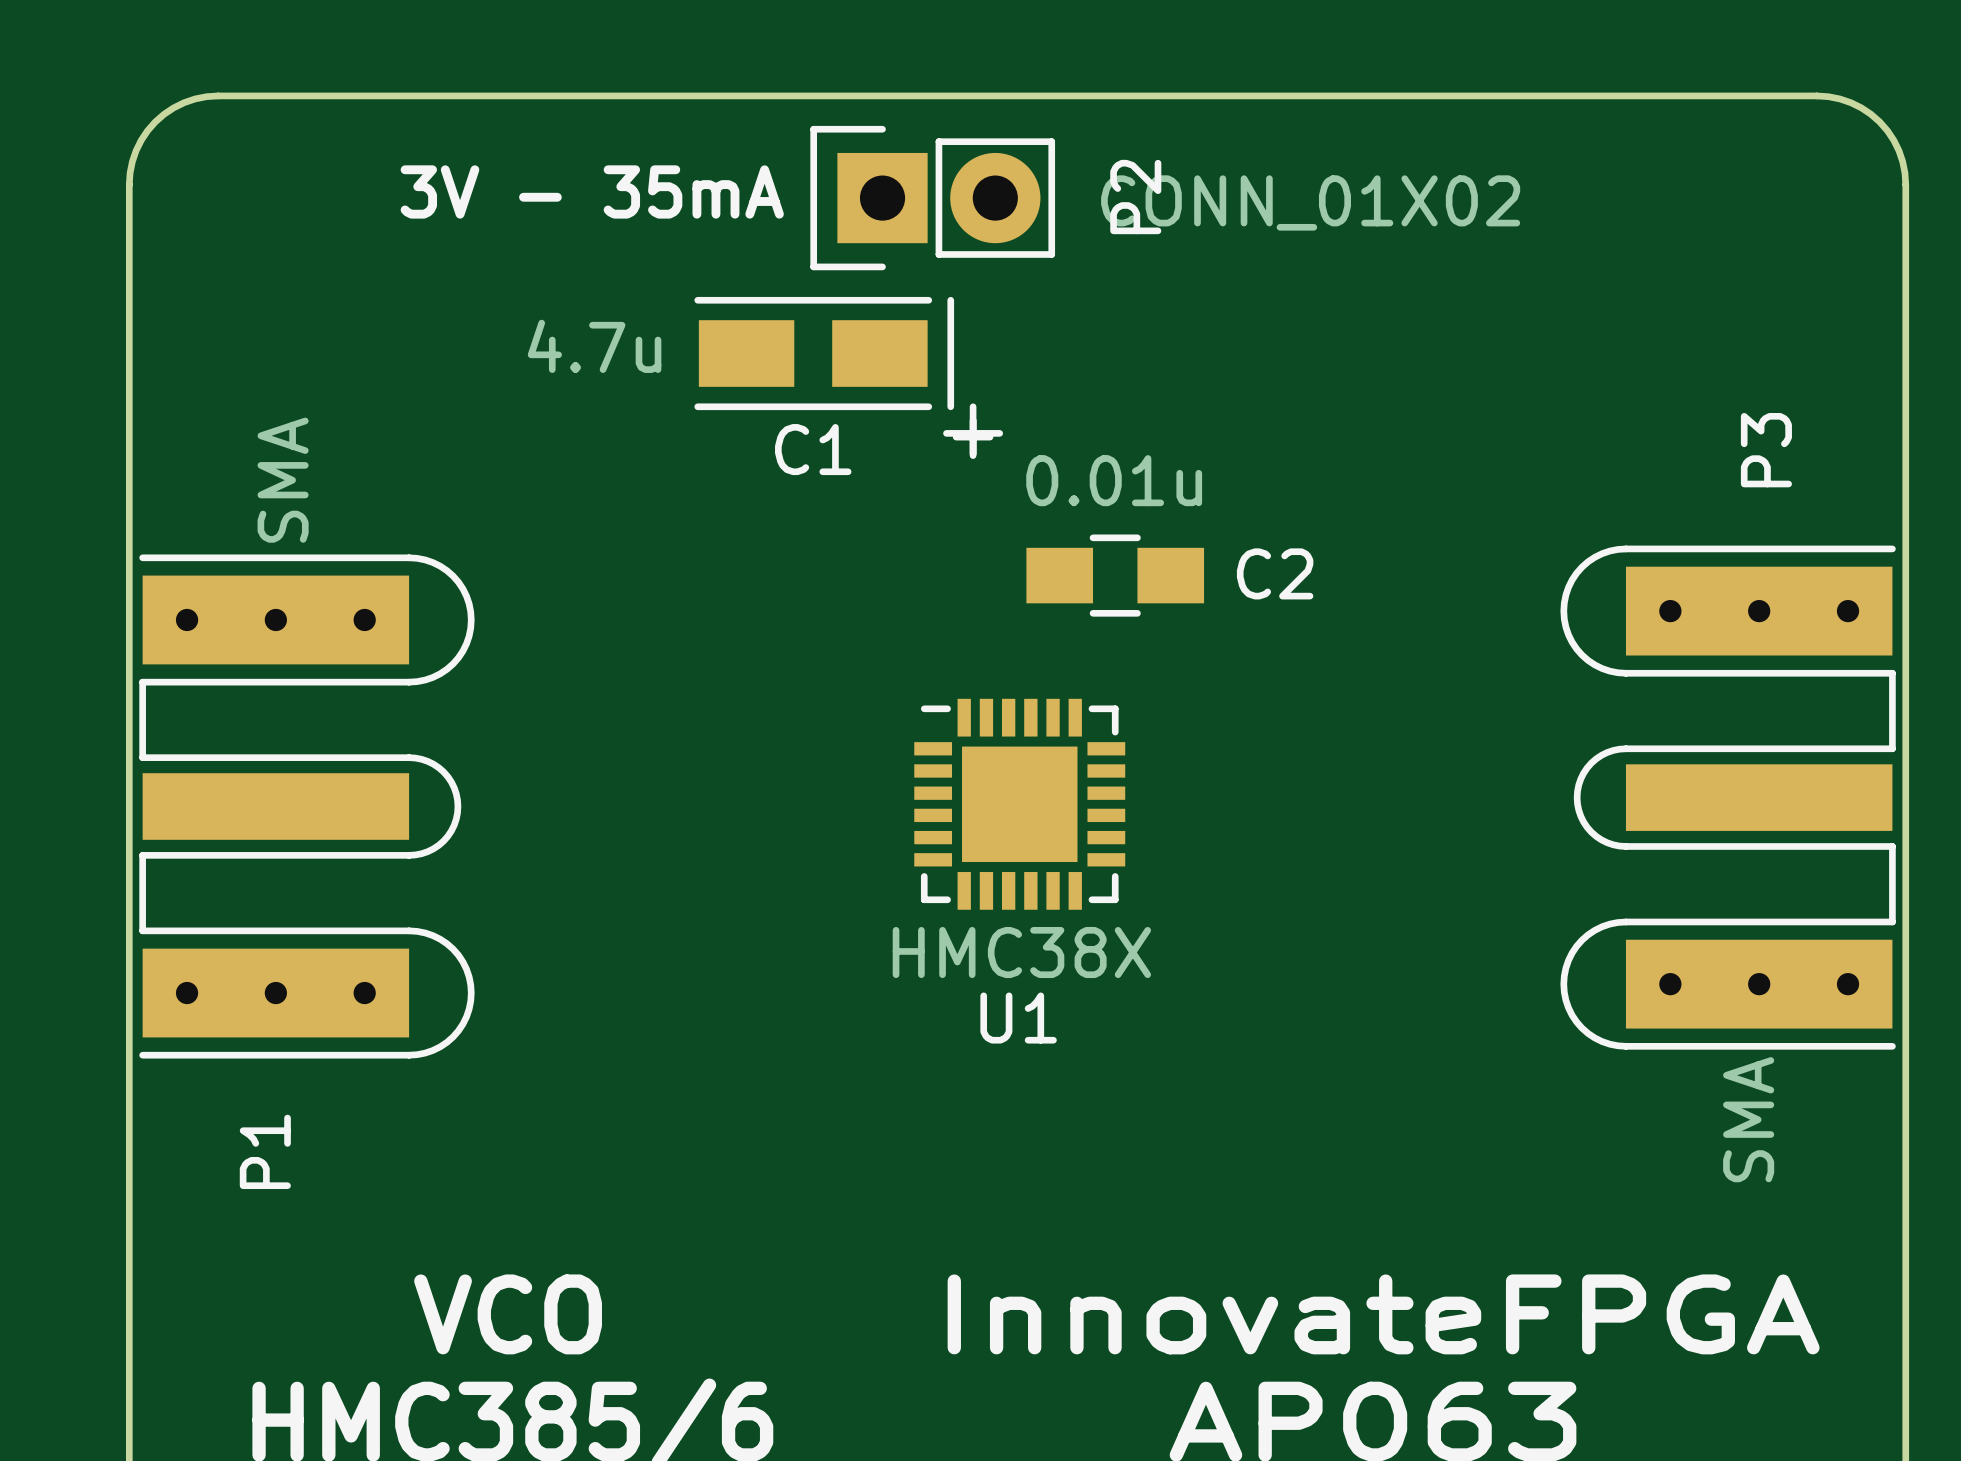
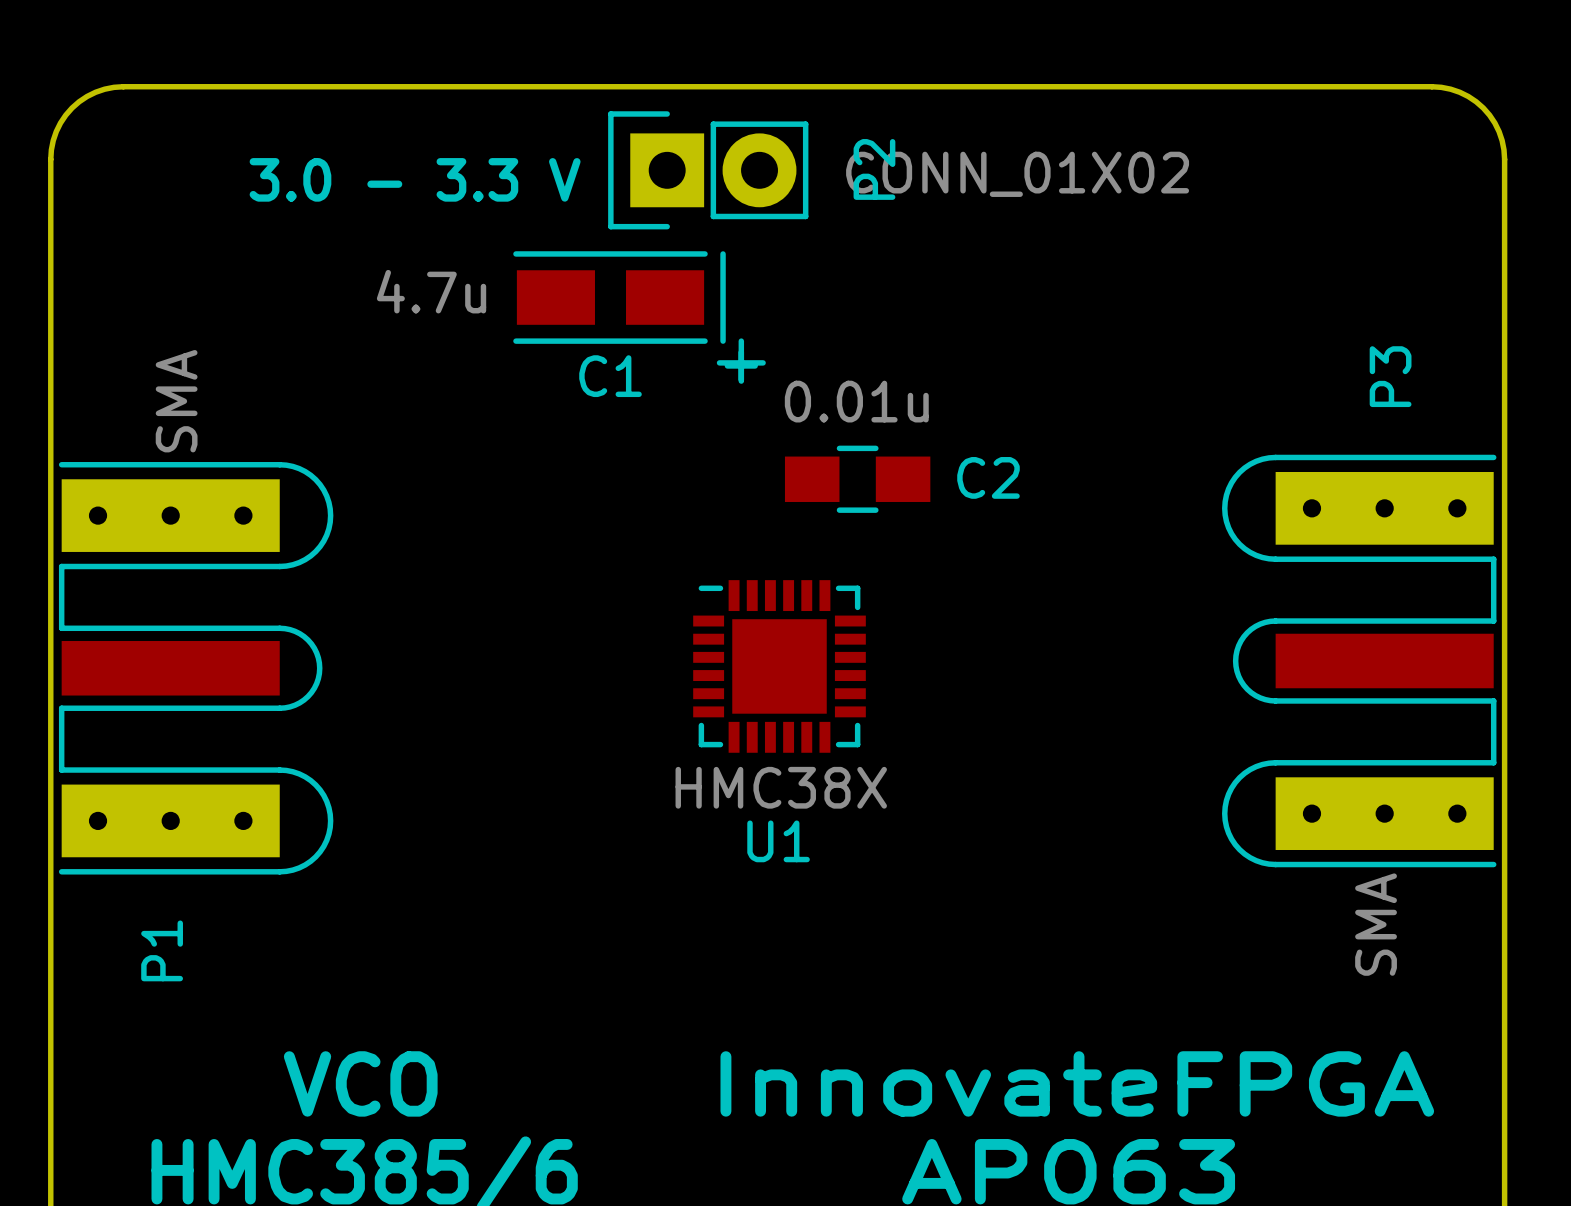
text: 3V - 35mA (592, 191) -> 3.0 - 3.3 V (415, 179)

